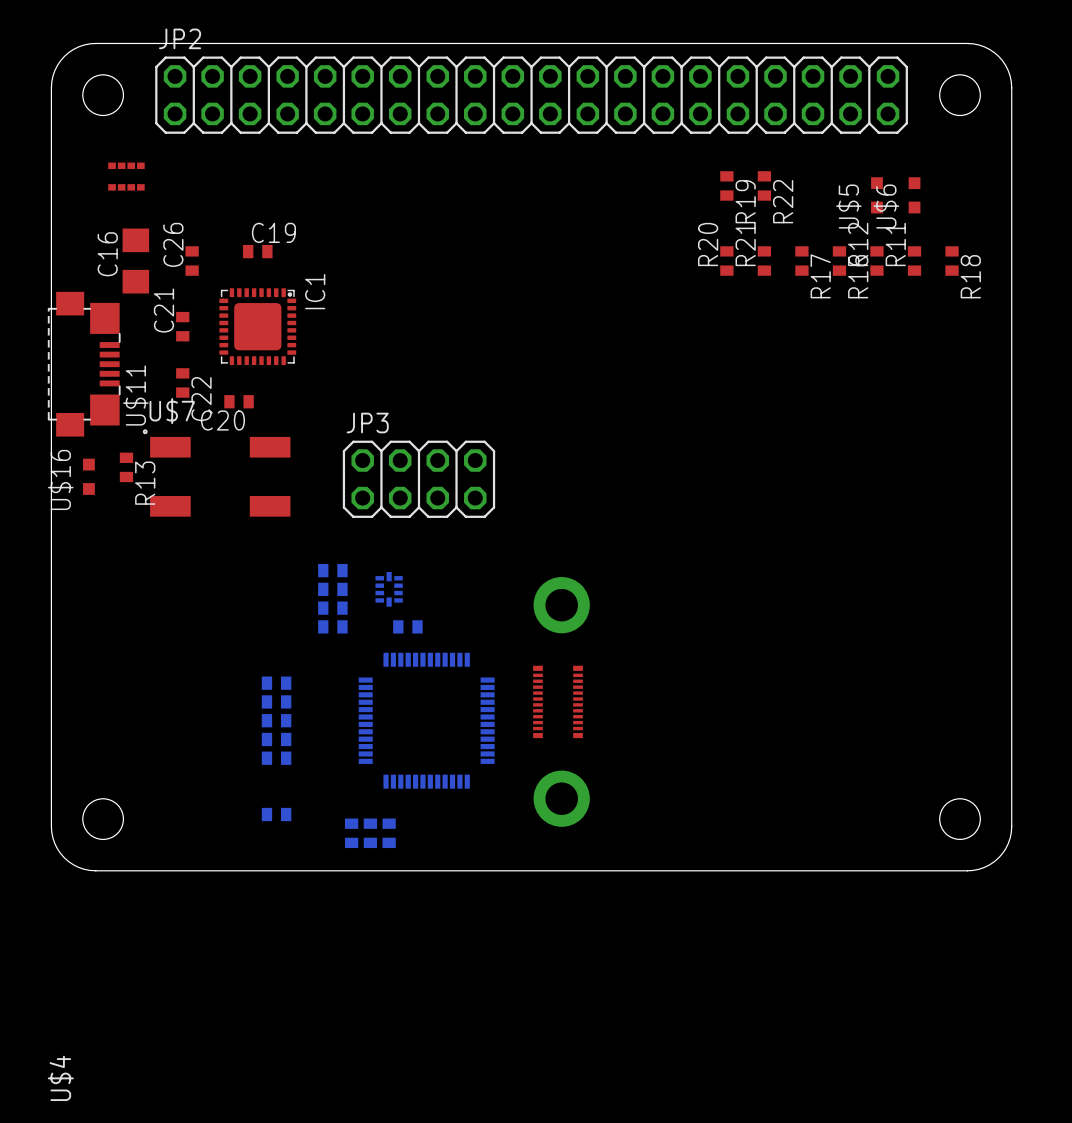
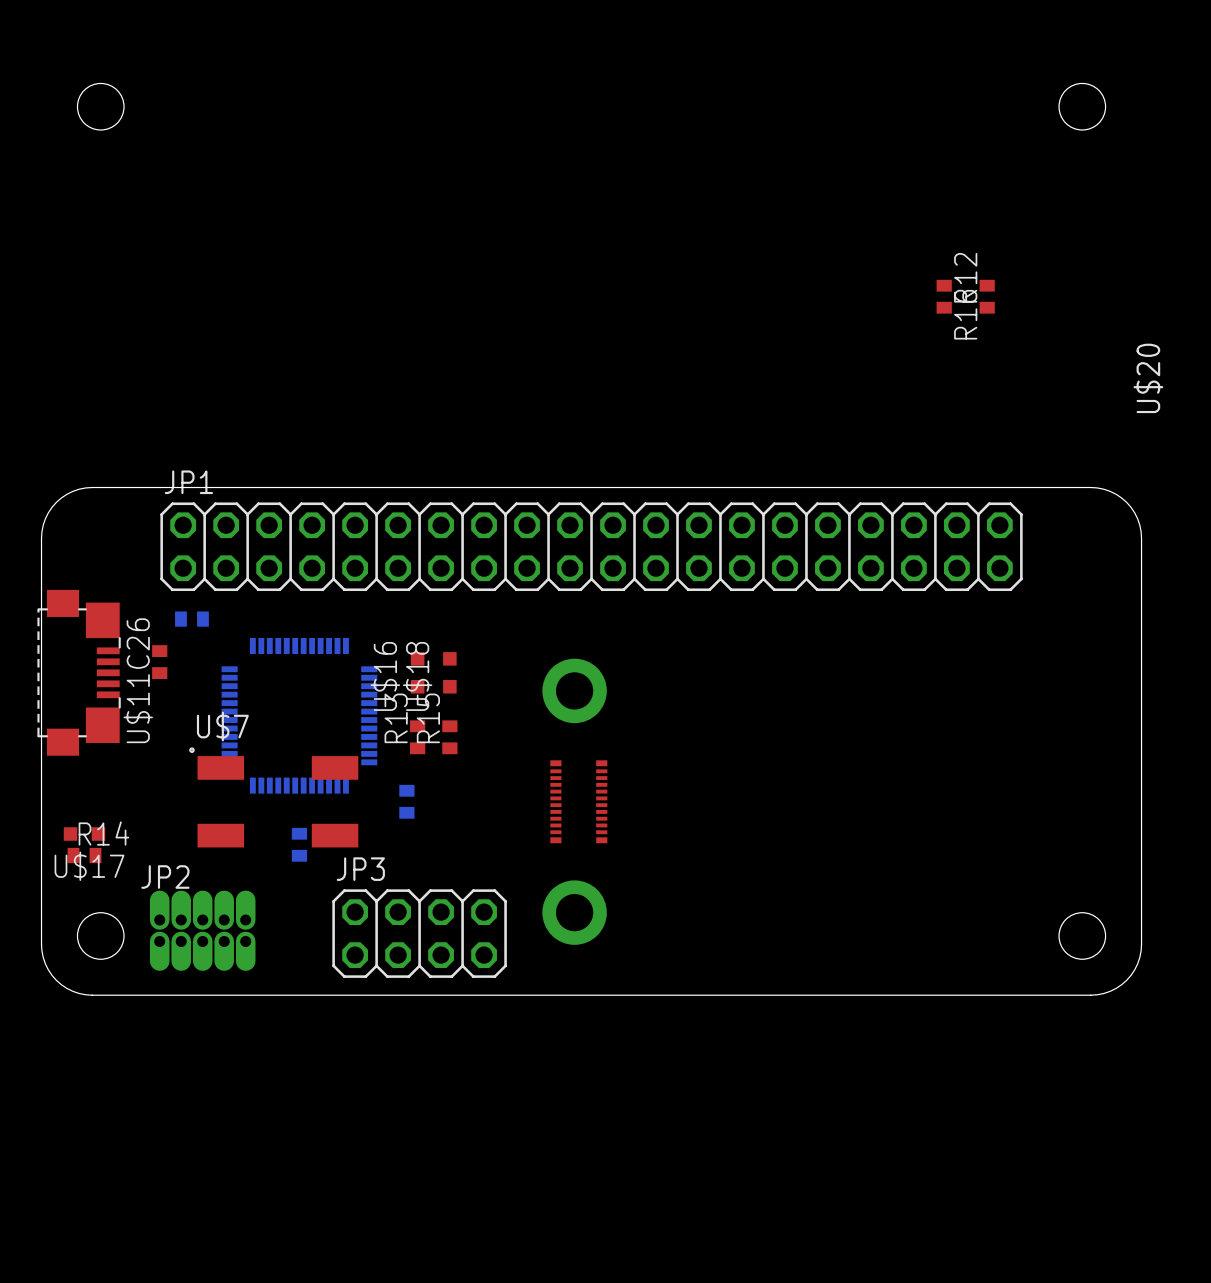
JP2 name position: JP2 (180, 38) -> JP2 (165, 877)
JP2 footprint: [155, 56, 908, 134] -> [149, 890, 256, 971]
part: (126, 176) -> none
R19: (726, 185) -> none
R22: (764, 185) -> none
U$5: (876, 195) -> none
U$6: (914, 195) -> none
C19: (257, 251) -> none
C16: (135, 261) -> none
C26 position: (192, 261) -> (159, 662)
R20: (726, 261) -> none
R21: (764, 261) -> none
R17: (801, 261) -> none
R11: (914, 261) -> none
R18: (952, 261) -> none
C21: (182, 326) -> none
IC1: (257, 326) -> none
U$11 position: (84, 364) -> (79, 672)
C22: (182, 382) -> none
C20: (239, 401) -> none
R13 position: (126, 467) -> (417, 737)
board edge: (51, 471) (51, 81) (57, 65) (68, 52) (84, 44) (95, 43) (967, 43) (984, 46) (994, 52) (1002, 60) (1010, 76) (1011, 87) (1011, 471) -> (41, 538) (45, 518) (56, 502) (72, 491) (92, 487) (1090, 487) (1110, 491) (1126, 502) (1137, 518) (1141, 538)
U$7 position: (216, 473) -> (273, 797)
U$16 position: (88, 476) -> (417, 672)
JP3 position: (418, 479) -> (419, 933)
JP1: none -> (591, 546)
R13 name position: R13 (145, 483) -> R13 (396, 718)
part: none -> (191, 619)
part: (332, 570) -> none
part: (332, 589) -> none
part: (389, 589) -> none
U$18: none -> (449, 672)
part: (332, 608) -> none
part: (332, 626) -> none
part: (407, 626) -> none
R15: none -> (449, 737)
part: (276, 683) -> none
part: (276, 701) -> none
part: none -> (406, 801)
U$20: none -> (574, 801)
U$4: (561, 701) -> none
part: (276, 720) -> none
part position: (426, 720) -> (299, 715)
U$17: none -> (84, 834)
part rotation: 0° (276, 739) -> 90° clockwise (299, 844)
R14: none -> (84, 855)
part: (276, 758) -> none
part: (276, 814) -> none
part: (351, 833) -> none
part: (370, 833) -> none
part: (389, 833) -> none

